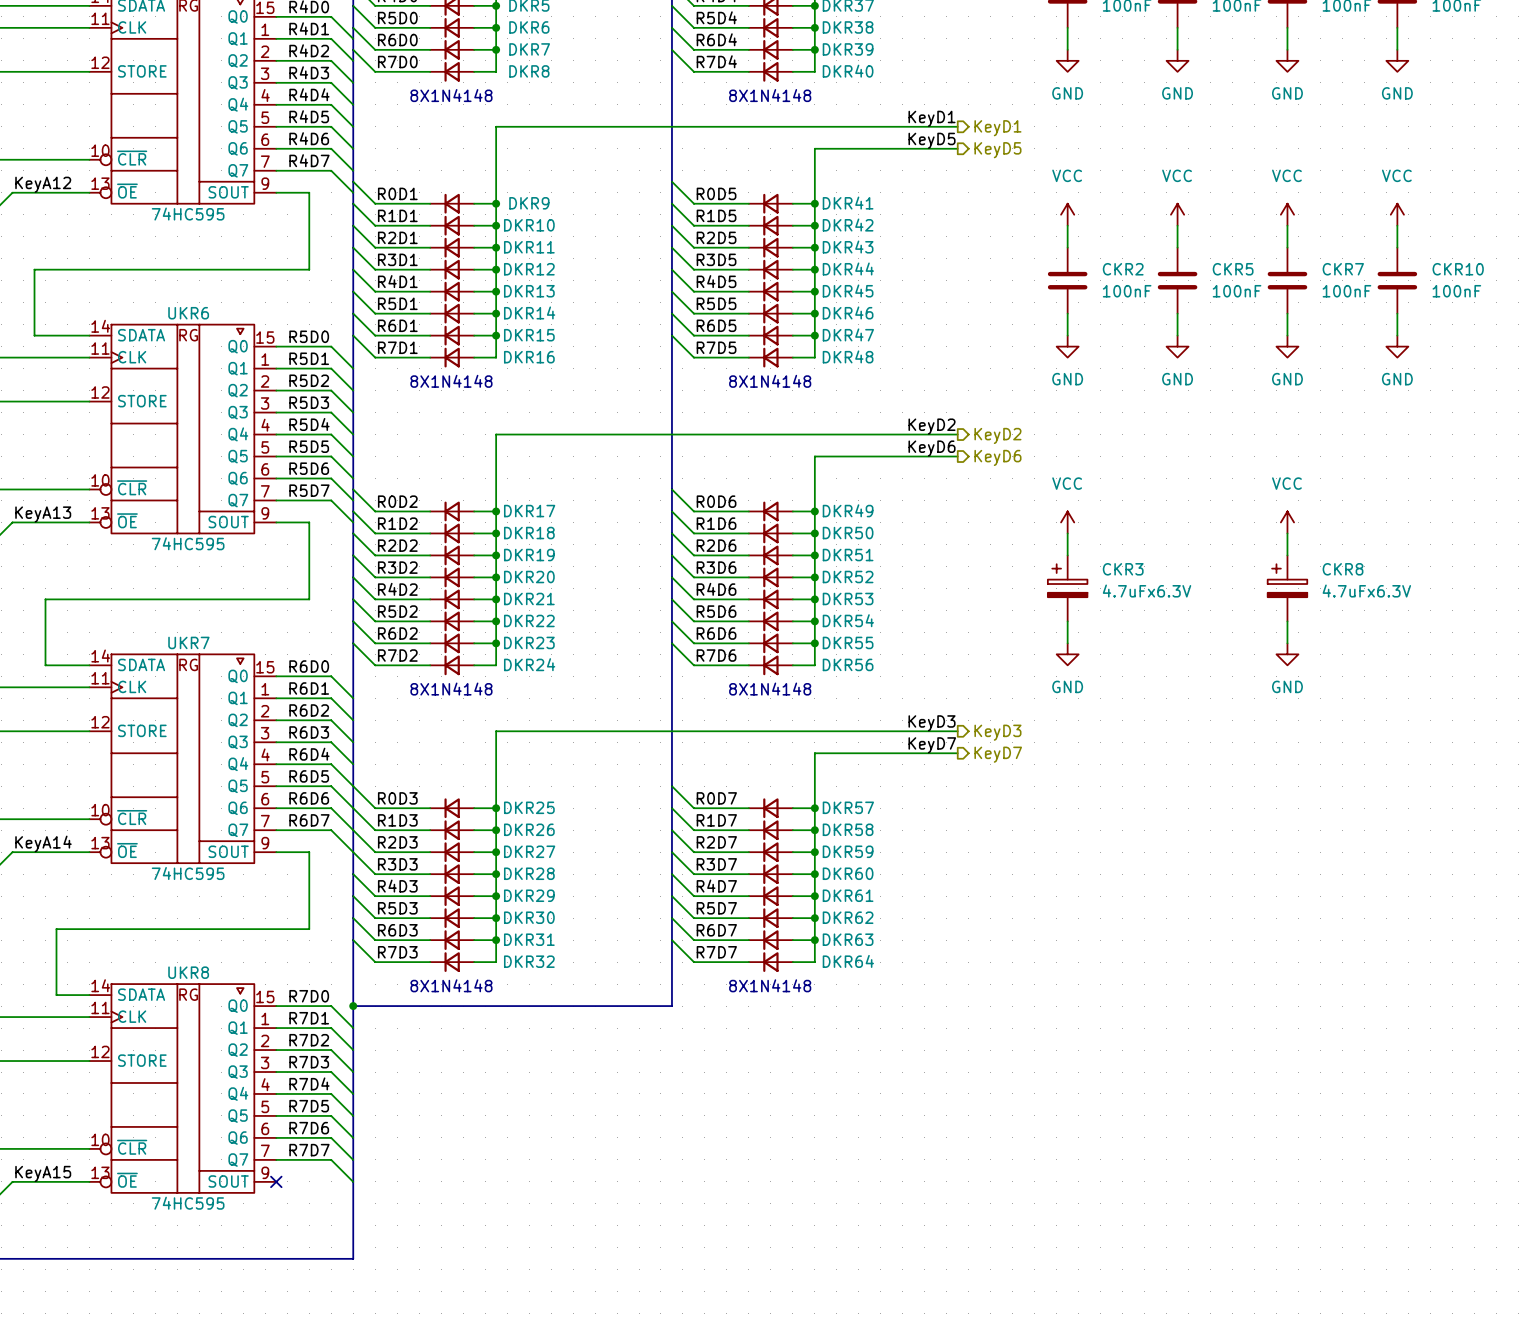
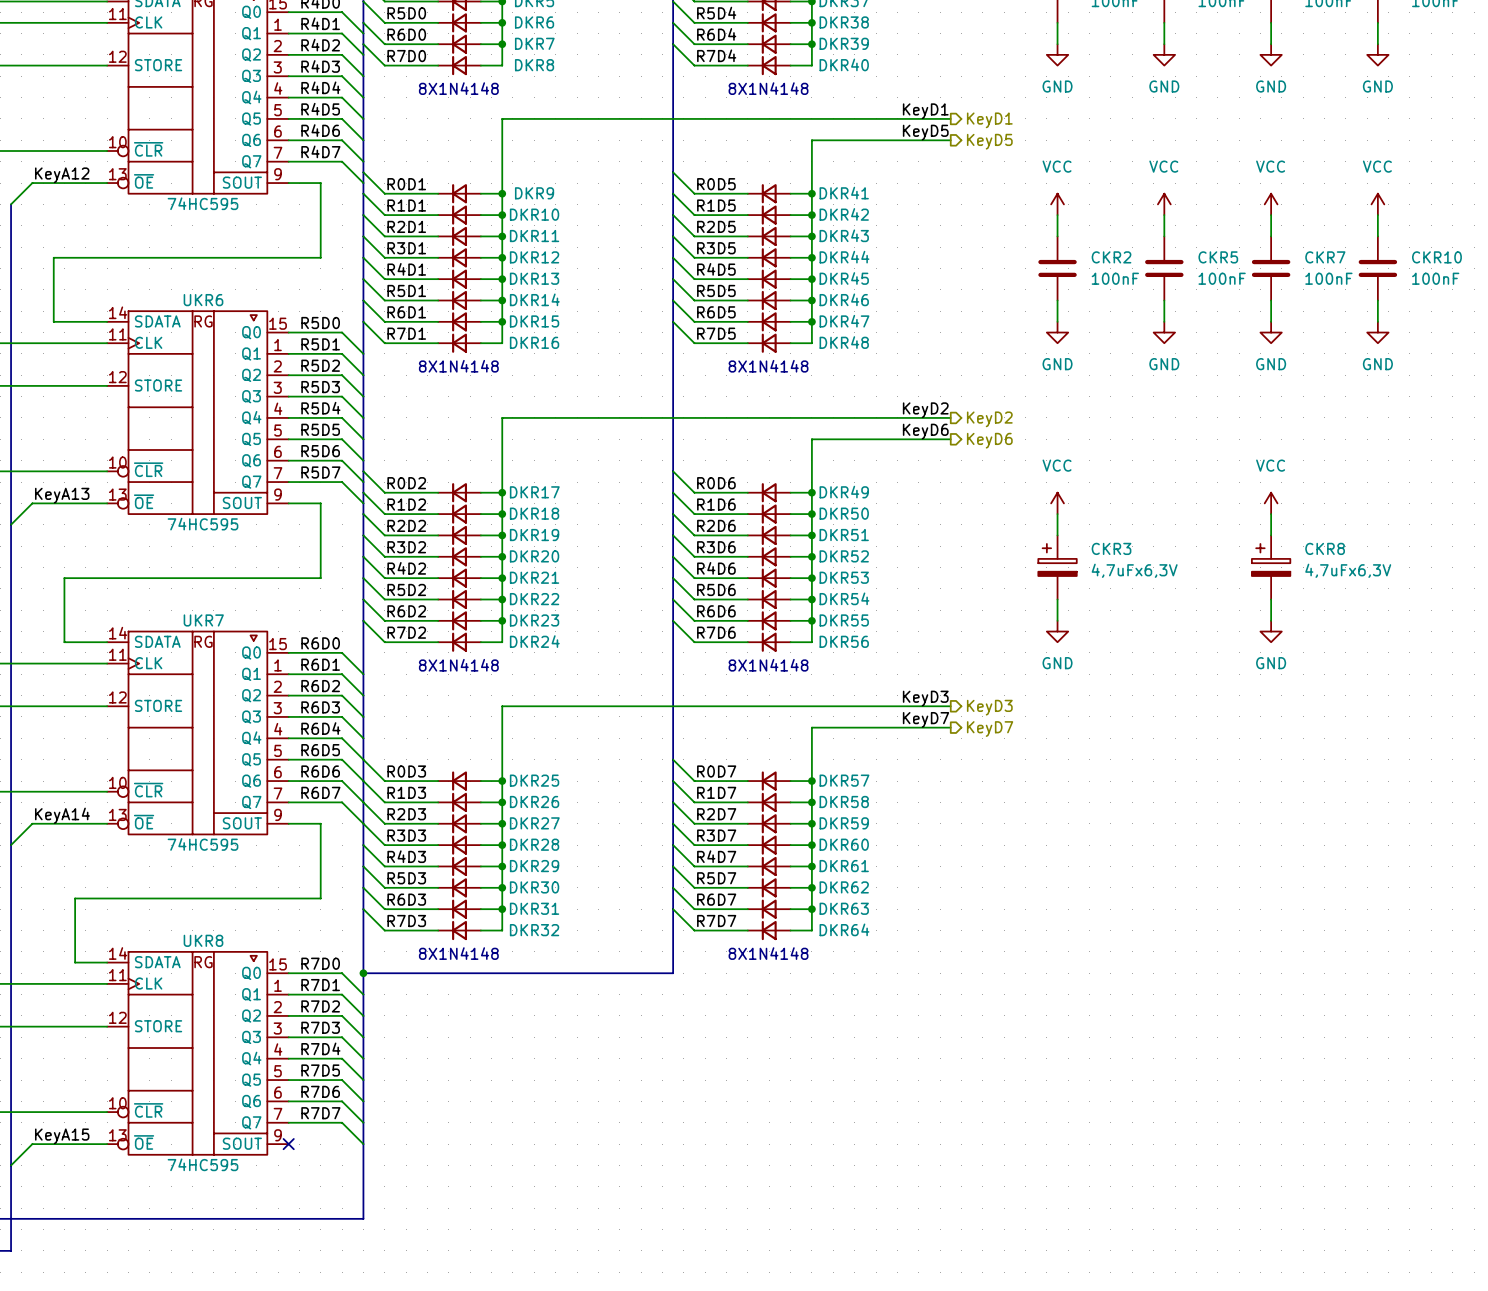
CKR3 value: 4.7uFx6.3V (1147, 591) -> 4,7uFx6,3V (1134, 570)
CKR8 value: 4.7uFx6.3V (1366, 591) -> 4,7uFx6,3V (1348, 570)

